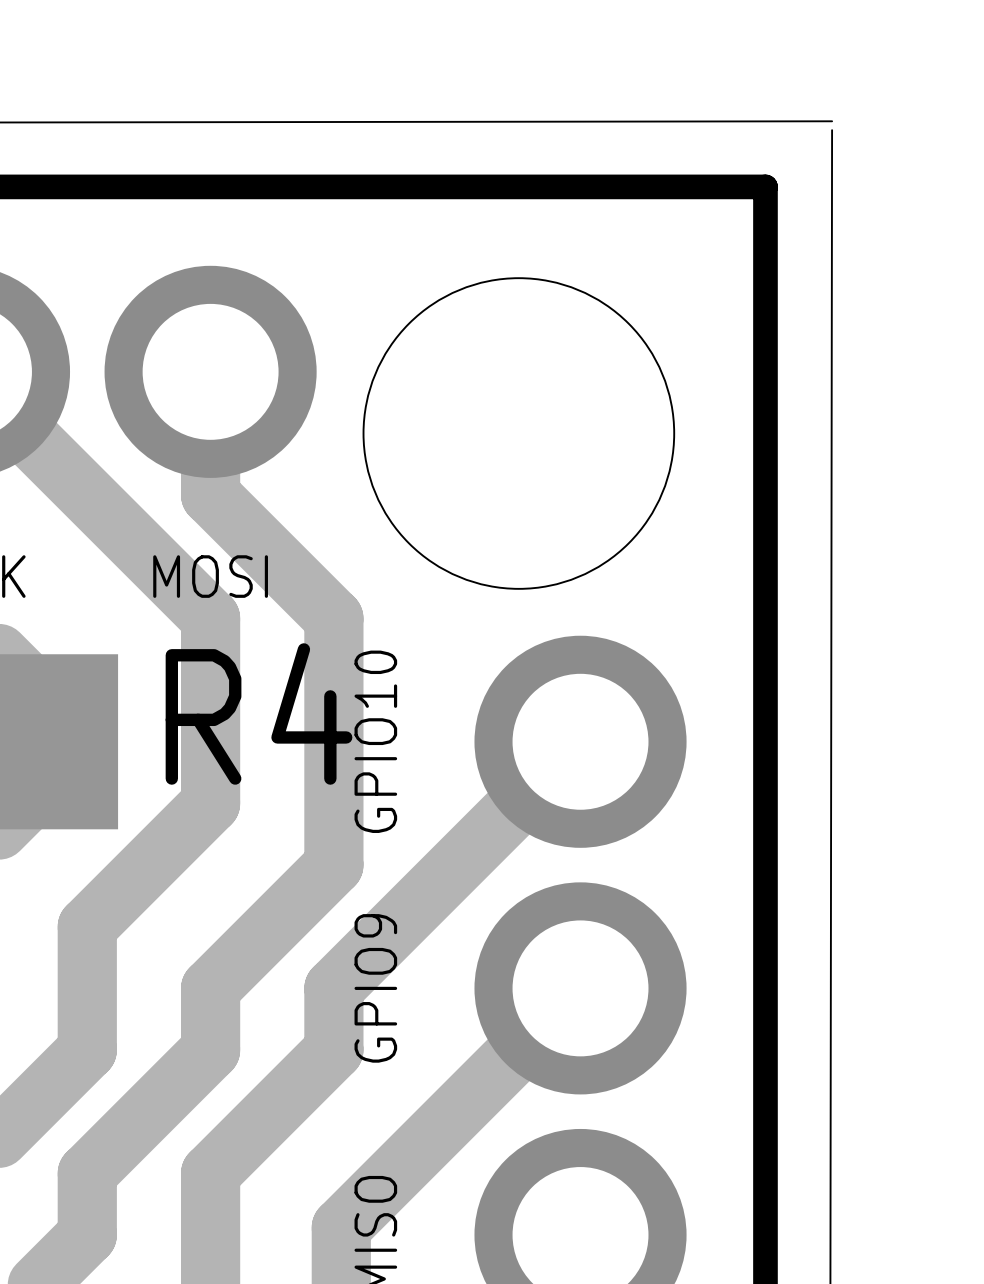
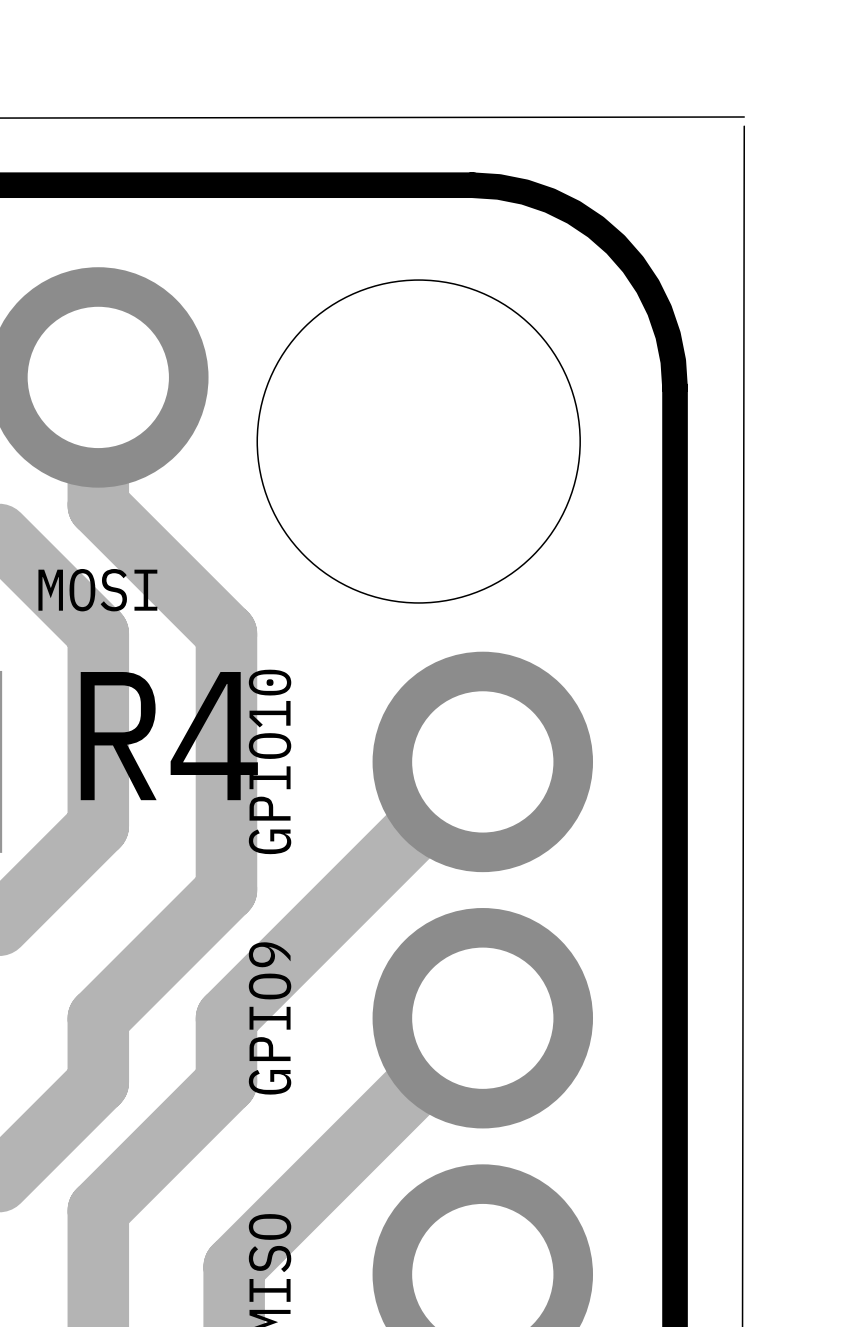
board edge: (570, 186) (765, 186) (765, 381) -> (472, 185) (498, 186) (524, 192) (549, 200) (573, 212) (595, 227) (615, 244) (633, 264) (647, 286) (659, 310) (668, 335) (673, 361) (675, 387)

